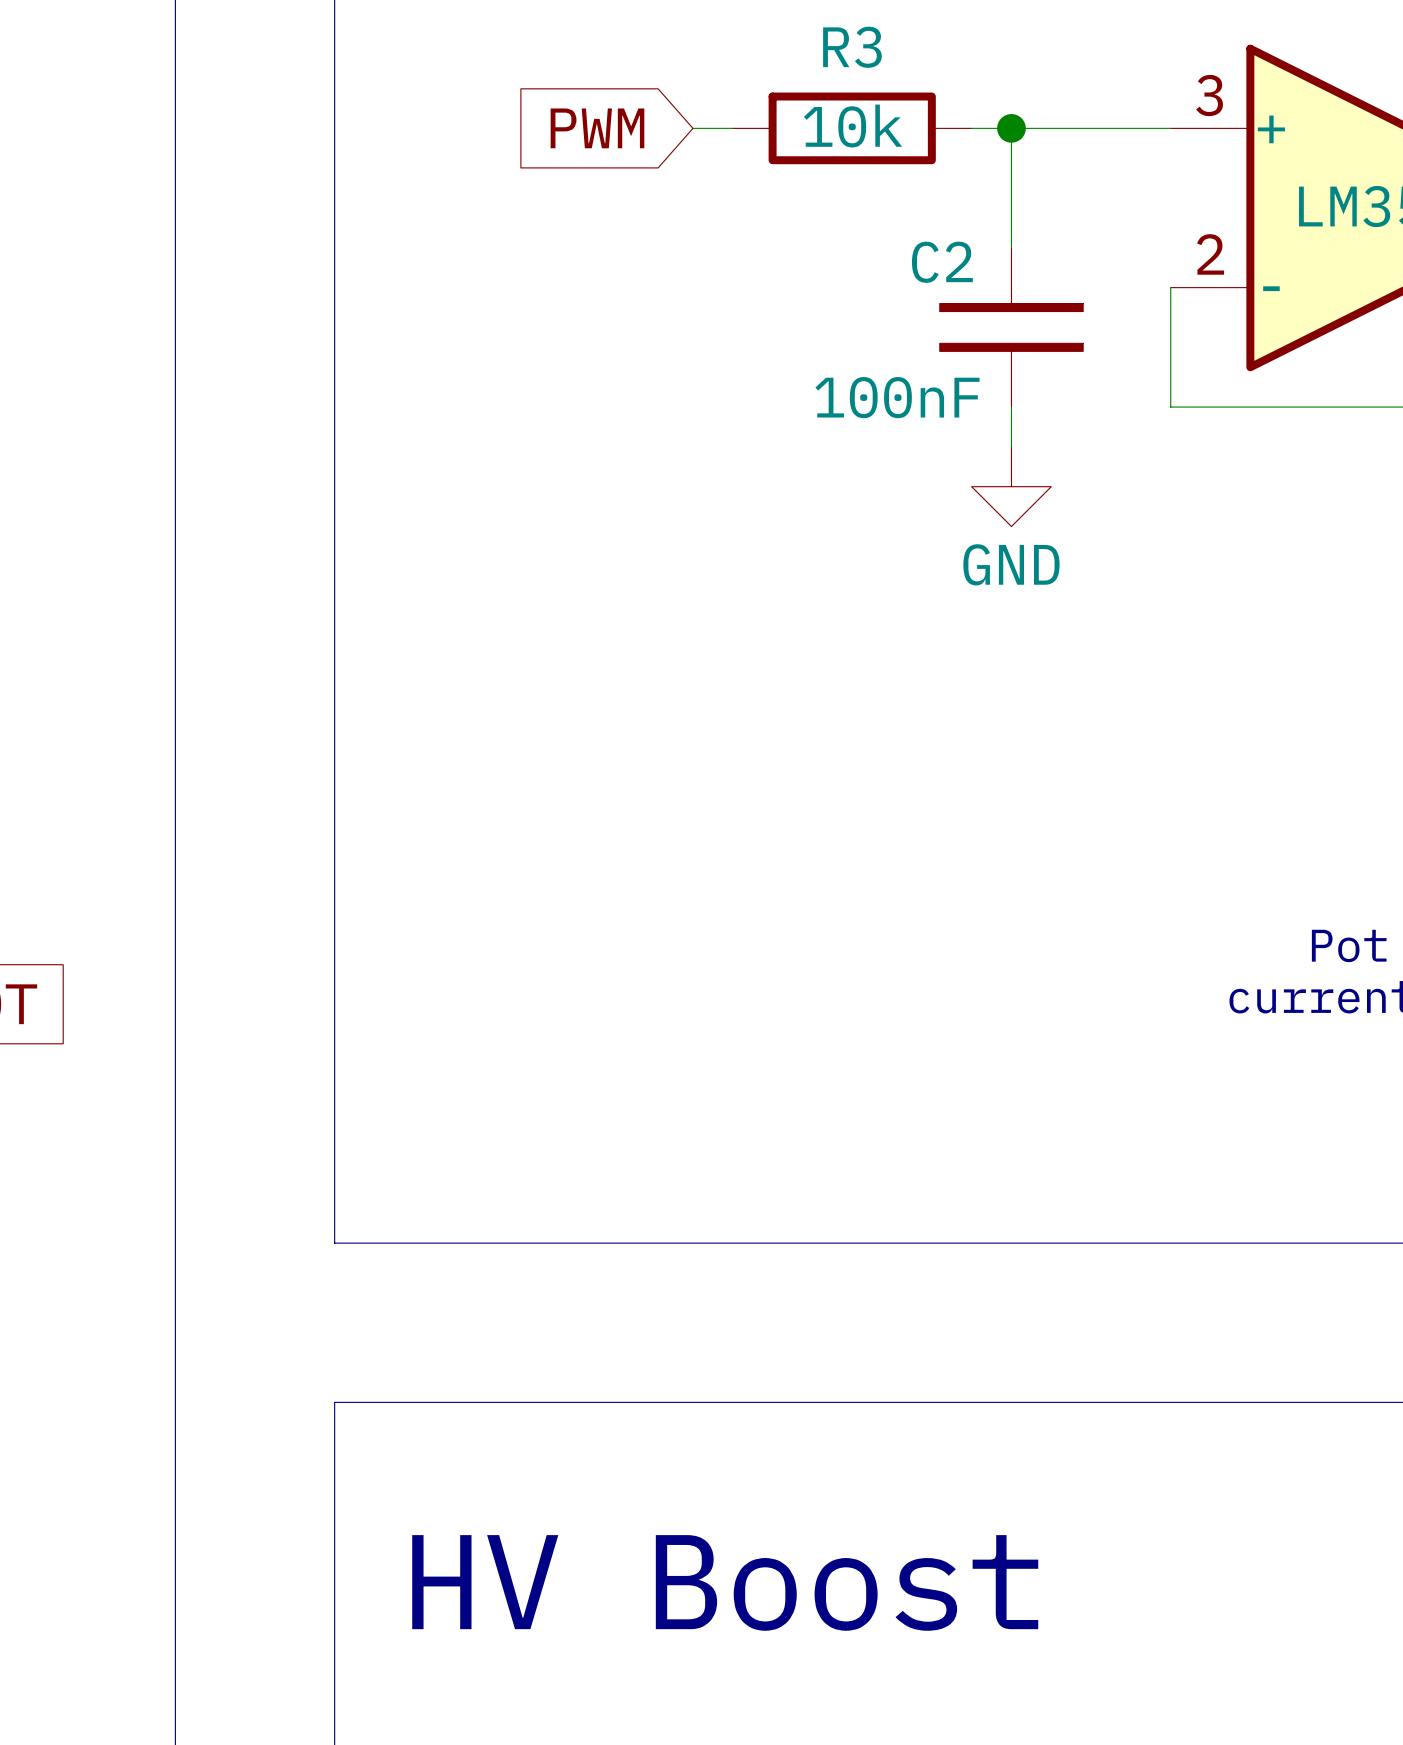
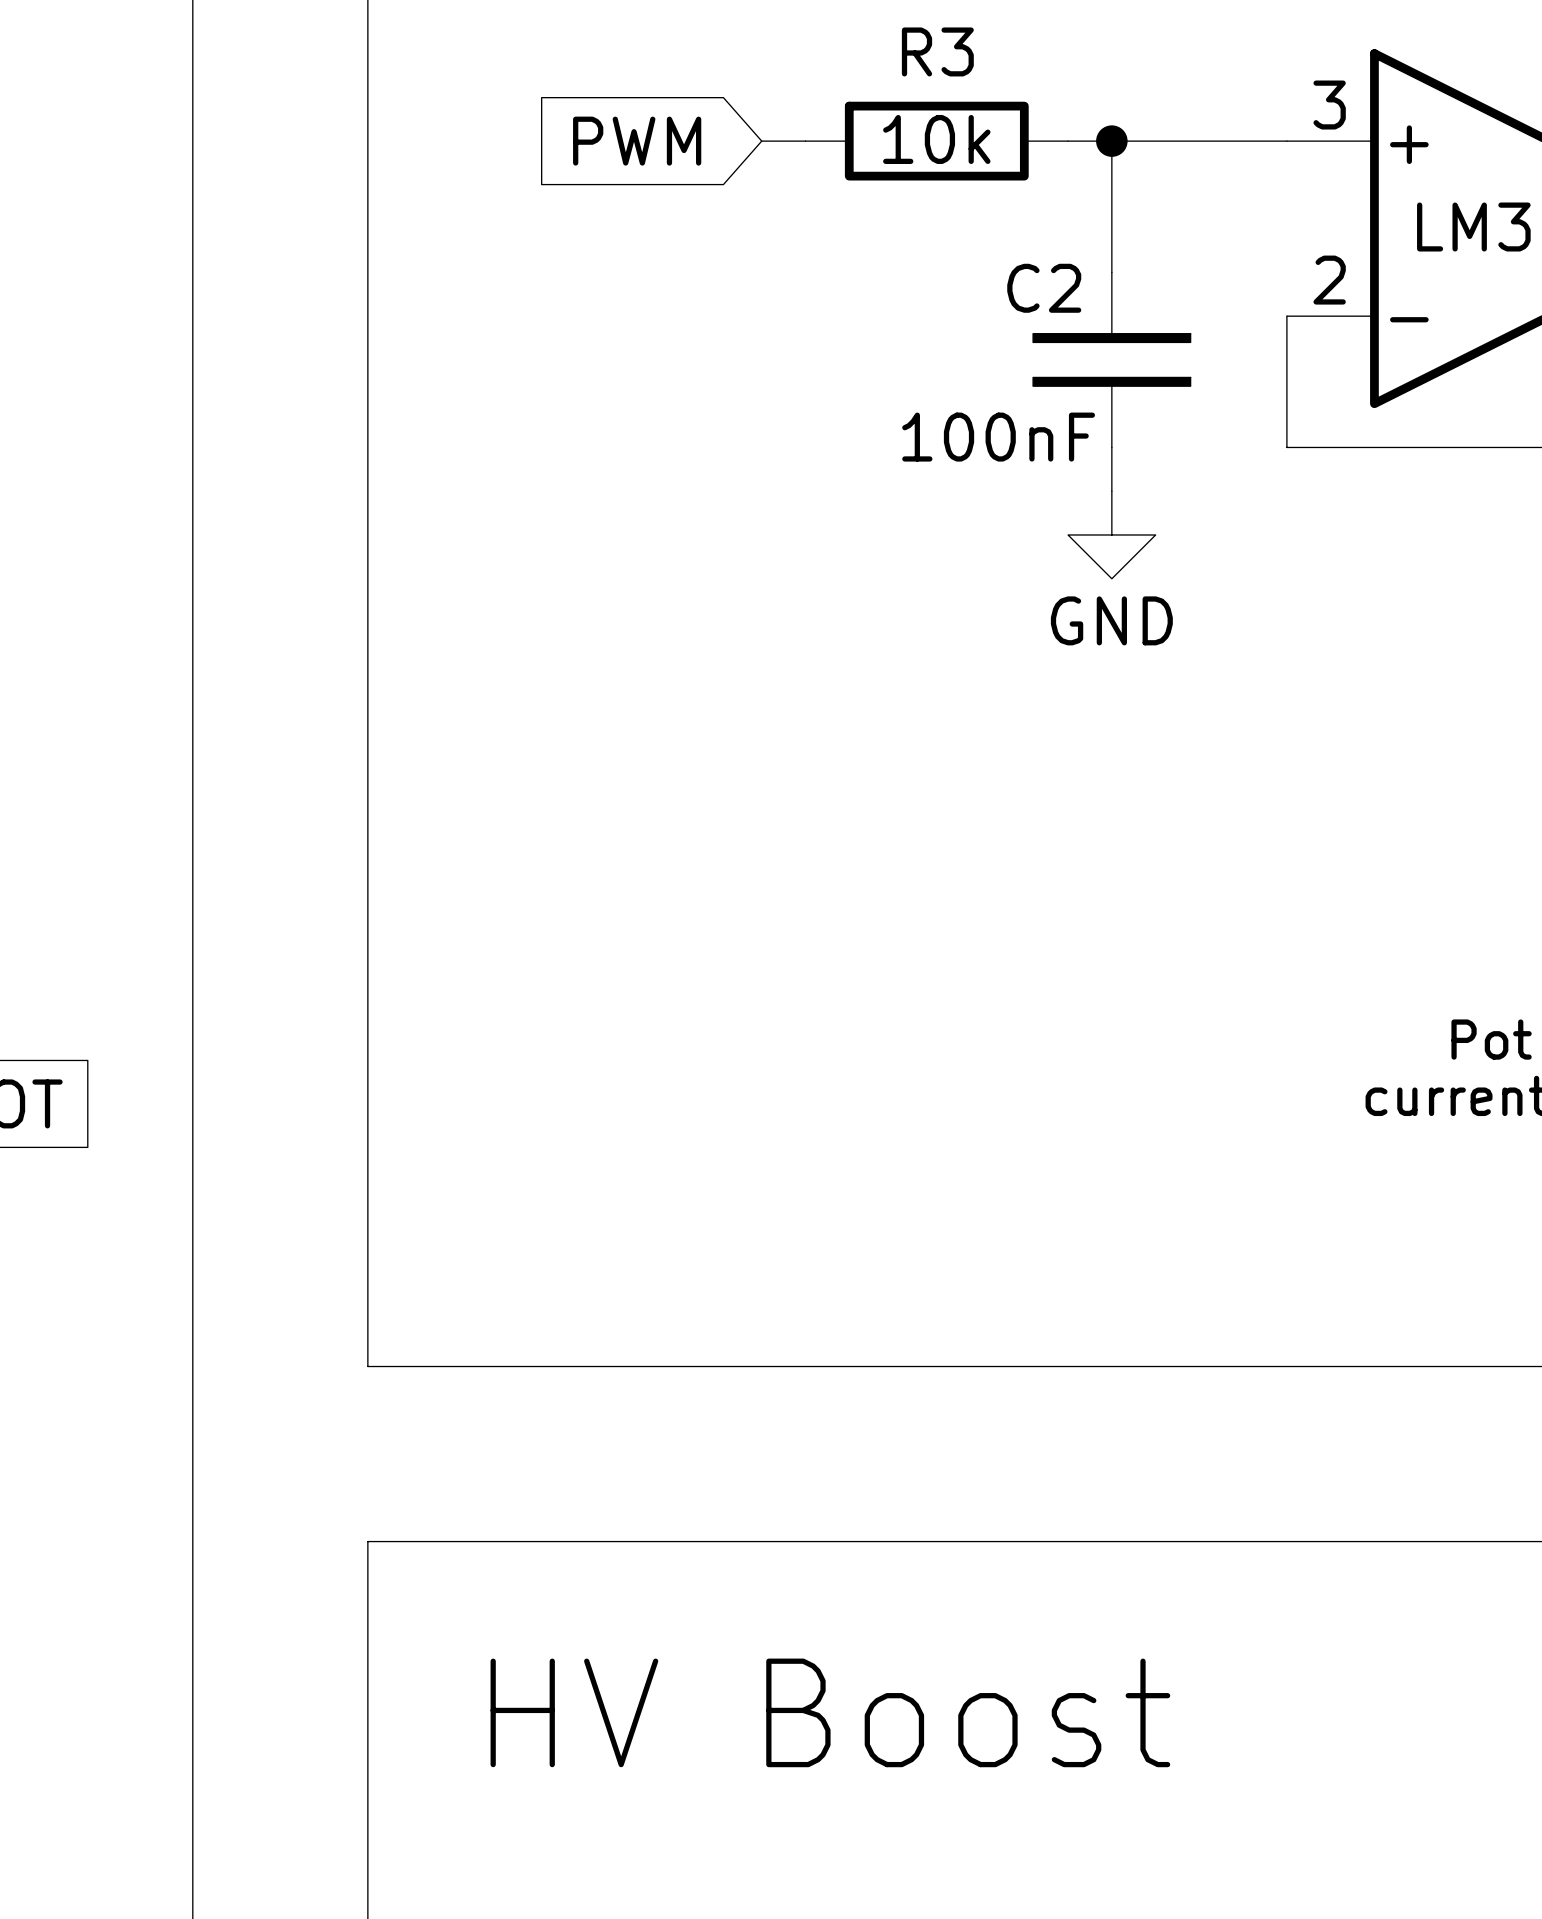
text position: HV Boost (725, 1582) -> HV Boost (830, 1712)

